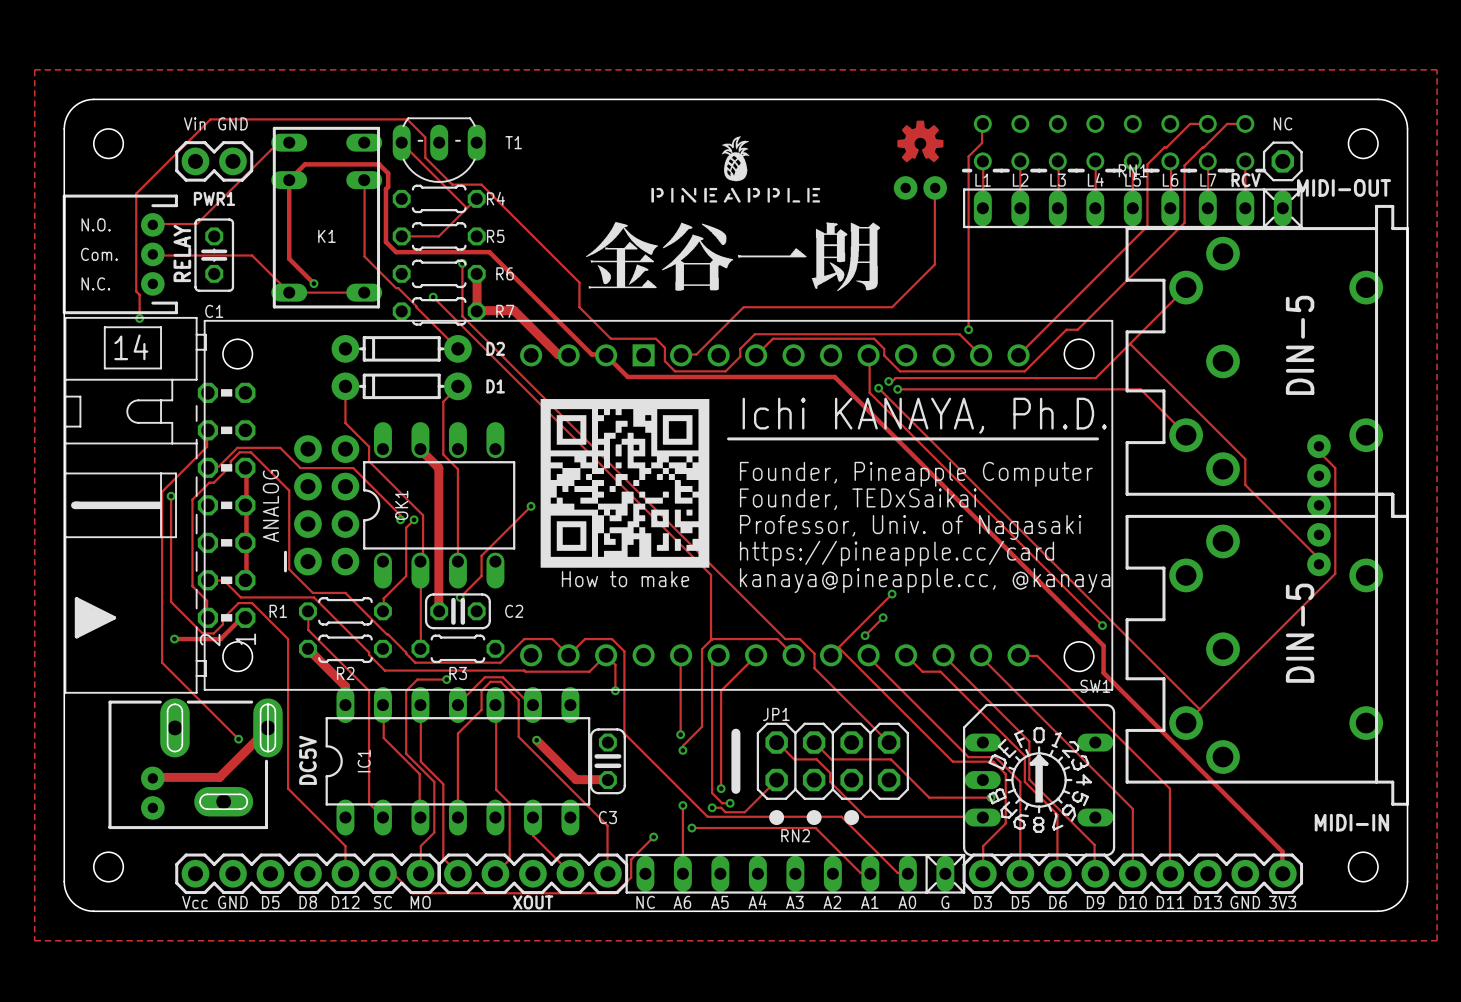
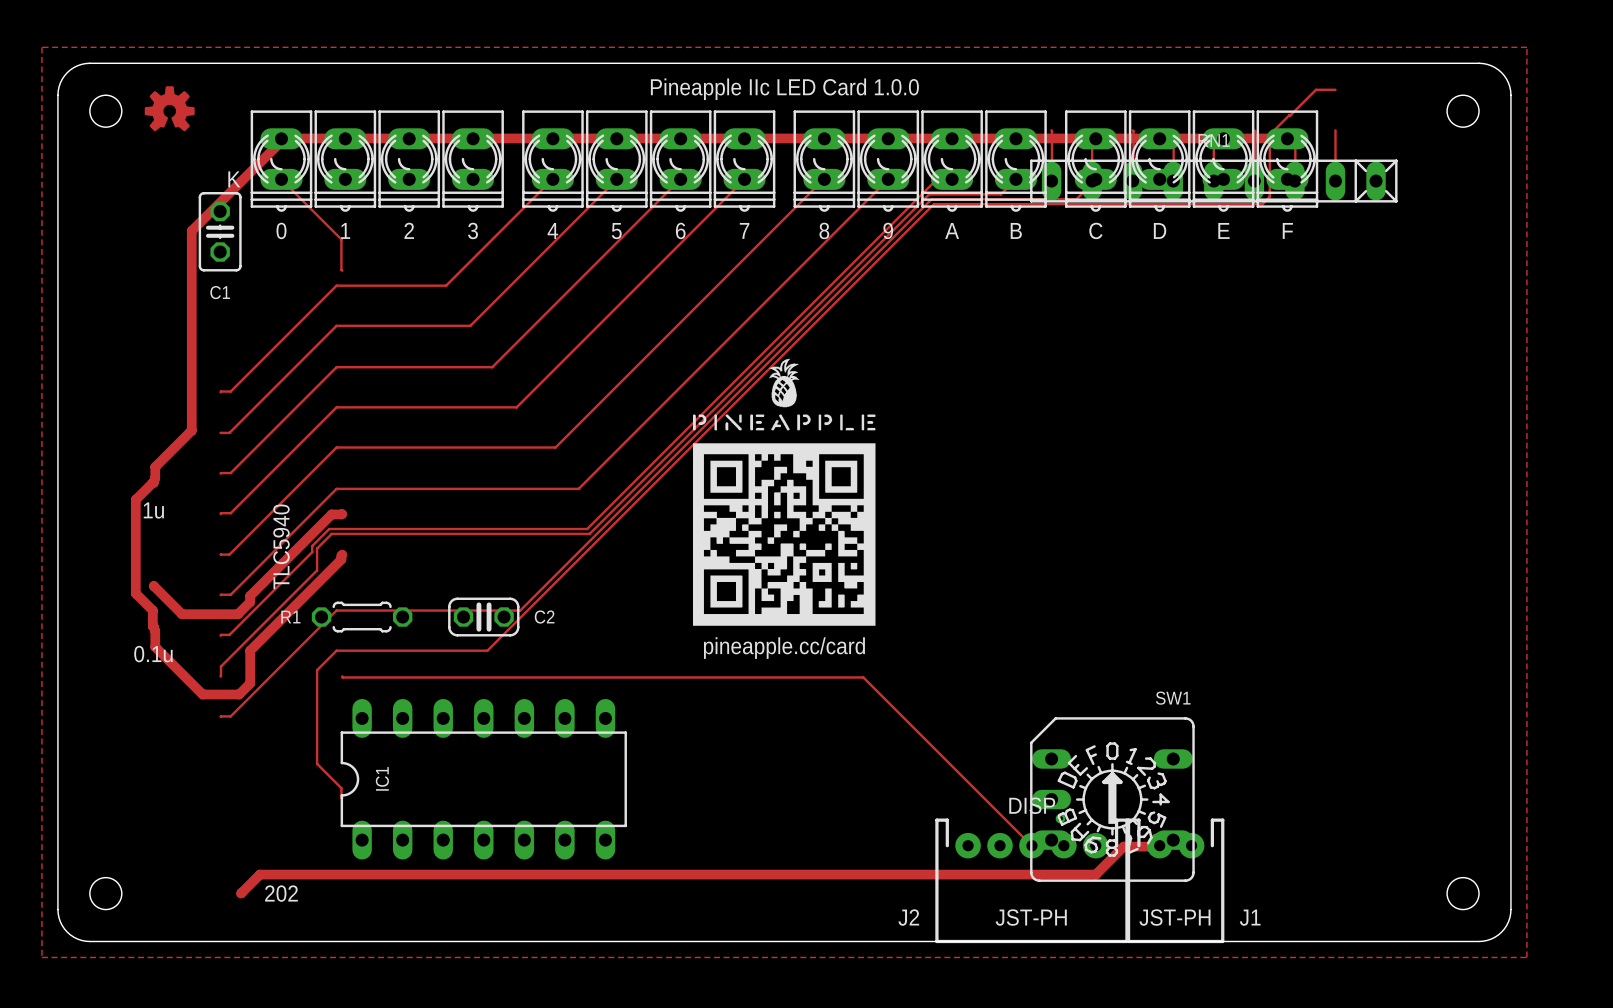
zone outline: (34, 69) (1437, 69) (1437, 940) (34, 940) (34, 69) -> (41, 47) (41, 957) (1526, 957) (1526, 47) (41, 47)
drawing: none -> [144, 86, 195, 132]
drawing: [897, 120, 944, 163] -> none
text: Vin (194, 123) -> none
text: GND (232, 123) -> none
track: (982, 123) (982, 143) (968, 156) (968, 329) -> none
track: (1207, 123) (1190, 123) (1147, 164) (1147, 226) (1018, 355) -> none
text: none -> Pineapple IIc LED Card 1.0.0 (784, 89)
track: (289, 142) (277, 143) (196, 224) (152, 224) -> none
track: (401, 142) (466, 208) -> none
L1: (982, 143) -> none
L2: (1020, 143) -> none
L3: (1057, 143) -> none
L4: (1095, 143) -> none
L5: (1132, 143) -> none
L6: (1170, 143) -> none
L7: (1207, 143) -> none
RCV: (1245, 143) -> none
T1: (439, 150) -> none
PWR1: (214, 161) -> none
NC: (1282, 161) -> none
drawing position: (735, 169) -> (784, 394)
track: none -> (1287, 138) (281, 138) (279, 143) (191, 230) (191, 430) (155, 466) (153, 482) (135, 499) (135, 593) (152, 610) (155, 647) (202, 694) (239, 694) (250, 683) (250, 650) (341, 559) (342, 554)
track: (364, 180) (364, 256) (457, 348) -> none
part: (920, 187) -> none
track: (935, 187) (934, 264) (892, 307) (743, 307) (696, 354) (681, 355) -> none
0: none -> (281, 161)
1: none -> (345, 161)
2: none -> (409, 161)
3: none -> (473, 161)
4: none -> (552, 161)
5: none -> (616, 161)
6: none -> (680, 161)
7: none -> (744, 161)
8: none -> (824, 161)
9: none -> (888, 161)
A: none -> (952, 161)
B: none -> (1015, 161)
C: none -> (1095, 161)
D: none -> (1159, 161)
E: none -> (1223, 161)
F: none -> (1287, 161)
R4: (439, 198) -> none
track: (476, 198) (438, 236) (401, 236) -> none
text: none -> K (234, 179)
track: none -> (281, 179) (341, 239) (342, 270)
track: none -> (552, 179) (446, 285) (336, 285) (230, 391) (220, 392)
track: none -> (616, 179) (470, 325) (336, 325) (229, 432) (220, 432)
track: none -> (680, 179) (492, 367) (336, 367) (230, 473) (220, 473)
track: none -> (744, 179) (516, 407) (336, 407) (230, 513) (220, 514)
track: none -> (824, 179) (555, 447) (336, 447) (229, 554) (220, 554)
track: none -> (888, 179) (578, 488) (336, 488) (230, 594) (220, 595)
track: none -> (952, 179) (936, 179) (587, 529) (329, 529) (312, 546) (312, 552) (229, 634) (220, 635)
track: none -> (1015, 179) (1000, 194) (929, 194) (589, 533) (331, 533) (317, 548) (317, 570) (220, 666) (220, 676)
K1: (326, 217) -> none
drawing: [586, 222, 881, 292] -> none
text: N.O. (96, 224) -> none
track: (1177, 229) (1077, 329) (1066, 329) (1024, 371) (899, 371) (884, 355) (884, 348) (874, 338) (772, 338) (756, 355) -> (1262, 204) (933, 204) (487, 650) (336, 650) (317, 670) (317, 763) (341, 788) (342, 797)
R5: (439, 236) -> none
text: Com. (99, 254) -> none
RELAY: (120, 254) -> none
track: (152, 254) (252, 255) (289, 292) (364, 292) -> none
track: (462, 263) (462, 316) (785, 639) (799, 639) (814, 653) (814, 668) (889, 742) -> none
via: (462, 263) -> none
R6: (439, 273) -> none
track: (476, 273) (476, 311) (514, 310) (558, 354) (568, 355) -> none
text: N.C. (95, 283) -> none
track: (313, 283) (289, 258) (289, 180) (304, 164) (379, 164) (388, 173) (388, 186) (385, 189) (385, 242) (396, 252) (489, 252) (591, 354) (605, 354) (627, 376) (834, 376) (1103, 645) (1103, 672) (1282, 851) (1282, 873) -> none
via: (313, 283) -> none
track: (1186, 287) (1095, 378) (895, 378) (892, 381) (888, 381) -> none
track: (433, 297) (711, 574) (711, 639) -> none
via: (433, 297) -> none
R7: (439, 311) -> none
track: (139, 318) (139, 294) (136, 291) (136, 193) (210, 119) (407, 119) (425, 137) (425, 157) (452, 184) (481, 184) (579, 282) (579, 307) (610, 338) (655, 338) (664, 347) (664, 361) (675, 371) (725, 371) -> (220, 716) (230, 716) (336, 610) (520, 610) (773, 357)
via: (139, 318) -> none
via: (968, 329) -> none
track: (1130, 343) (1245, 459) (1245, 484) (1318, 558) (1318, 564) -> none
D2: (401, 348) -> none
track: (868, 355) (869, 392) (1102, 625) -> none
track: (980, 355) (959, 334) (754, 334) (740, 348) (740, 356) -> (1095, 179) (1076, 199) (931, 199) (789, 341)
MIDI-OUT: (1267, 361) -> none
via: (888, 381) -> none
track: (345, 386) (345, 423) (369, 446) (369, 461) (423, 515) (423, 559) (420, 561) (420, 648) -> none
D1: (401, 386) -> none
track: (457, 386) (443, 401) (443, 454) (457, 469) (457, 561) -> none
track: (878, 388) (1199, 709) -> none
via: (878, 388) -> none
track: (897, 389) (1140, 389) (1186, 435) -> none
via: (897, 389) -> none
text: Ichi KANAYA, Ph.D. (924, 415) -> none
track: (207, 430) (207, 446) (162, 491) (162, 662) (238, 739) -> none
line: (728, 438) (1097, 438) -> none
track: (1318, 446) (1319, 452) (1335, 468) (1335, 573) (1186, 723) -> none
track: (420, 449) (438, 468) (439, 611) -> none
track: (207, 467) (218, 466) (237, 447) (280, 447) (300, 468) (353, 468) (400, 515) (400, 519) -> none
track: (245, 467) (245, 580) -> none
text: Founder, Pineapple Computer (916, 474) -> none
drawing position: (625, 483) -> (784, 534)
track: (171, 496) (171, 601) (202, 633) (213, 633) (222, 624) (222, 618) (238, 603) (252, 603) (288, 639) (288, 788) (345, 846) (345, 873) -> none
via: (171, 496) -> none
text: Founder, TEDxSaikai (858, 499) -> none
ANALOG: (159, 505) -> none
part: (321, 505) -> none
OK1: (439, 505) -> none
part: (658, 505) -> none
part: (1318, 505) -> none
track: (531, 506) (481, 555) (481, 576) (460, 597) -> none
via: (531, 506) -> none
text: none -> 1u (153, 510)
track: none -> (342, 514) (331, 514) (250, 595) (250, 602) (238, 614) (182, 614) (153, 585)
via: (400, 519) -> none
track: (414, 519) (406, 527) (406, 576) (383, 598) (382, 611) -> none
via: (414, 519) -> none
text: Professor, Univ. of Nagasaki (910, 527) -> none
text: none -> TLC5940 (281, 546)
text: https://pineapple.cc/card (897, 553) -> none
text: How to make (625, 579) -> none
track: (207, 580) (223, 580) (240, 597) (313, 597) (384, 670) (589, 671) (606, 655) (615, 664) (615, 690) -> none
text: kanaya@pineapple.cc, @kanaya (925, 580) -> none
track: (892, 594) (831, 655) (839, 648) (952, 761) (993, 761) (1005, 774) (1005, 823) (983, 846) (982, 873) -> none
via: (892, 594) -> none
via: (460, 597) -> none
track: (307, 611) (308, 630) (369, 690) (369, 803) (382, 817) -> none
track: (207, 617) (207, 600) (192, 586) (192, 499) (209, 482) (213, 482) (230, 465) (230, 461) (239, 452) (250, 452) (289, 490) (289, 569) (312, 592) (345, 592) (415, 662) (500, 662) (524, 639) (552, 639) (568, 655) (585, 639) (612, 639) (624, 651) (624, 733) (707, 816) (841, 816) (897, 873) (907, 873) -> none
track: (245, 617) (240, 618) (220, 639) (174, 639) -> none
track: (883, 617) (865, 635) -> none
via: (883, 617) -> none
via: (1102, 625) -> none
via: (865, 635) -> none
via: (174, 639) -> none
text: none -> pineapple.cc/card (784, 648)
text: none -> 0.1u (153, 654)
track: (307, 648) (345, 686) (345, 705) -> none
R2: (345, 648) -> none
R3: (457, 648) -> none
MIDI-IN: (1267, 649) -> none
track: (681, 655) (680, 734) -> none
track: (718, 655) (712, 661) (712, 793) (722, 803) (730, 803) -> none
track: (756, 655) (721, 690) (721, 788) -> none
track: (793, 655) (777, 639) (712, 639) (702, 649) (702, 726) (682, 745) (682, 750) -> none
track: (868, 655) (968, 757) (995, 757) (1020, 781) (1020, 873) -> none
track: (906, 655) (922, 671) (940, 671) (1024, 756) (1024, 781) (1057, 814) (1057, 873) -> none
track: (943, 655) (1029, 741) (1029, 779) (1094, 844) (1095, 873) -> none
track: (981, 655) (1132, 808) (1132, 873) -> none
track: (1018, 655) (1037, 655) (1169, 788) (1170, 873) -> none
track: none -> (342, 676) (863, 677) (1031, 845)
track: (446, 679) (417, 679) (406, 690) (406, 753) (434, 781) (434, 832) (420, 846) (420, 873) -> none
via: (446, 679) -> none
via: (615, 690) -> none
track: (382, 705) (383, 738) (419, 774) (420, 817) -> none
track: (420, 705) (420, 761) (443, 784) (443, 858) (457, 873) -> none
track: (457, 705) (484, 677) (502, 677) (532, 705) -> none
track: (495, 705) (496, 789) (509, 803) (509, 859) (495, 873) -> none
track: (267, 727) (219, 777) (152, 778) -> none
line: (735, 733) (735, 789) -> none
via: (680, 734) -> none
via: (238, 739) -> none
track: (536, 740) (576, 779) (607, 780) -> none
via: (536, 740) -> none
track: (776, 742) (794, 759) (816, 759) (830, 772) (830, 781) (865, 816) (982, 817) -> none
track: (814, 742) (831, 759) (890, 759) (929, 797) (991, 797) -> none
via: (682, 750) -> none
C3: (607, 761) -> none
JP1: (832, 761) -> none
DC5V: (195, 763) -> none
track: (776, 780) (744, 812) (725, 812) (721, 807) (712, 807) -> none
text: none -> DISP (1032, 805)
via: (721, 788) -> none
part: (152, 793) -> none
via: (730, 803) -> none
track: (682, 805) (682, 873) -> none
via: (682, 805) -> none
via: (712, 807) -> none
drawing: [769, 810, 785, 826] -> none
drawing: [806, 810, 822, 826] -> none
drawing: [844, 810, 860, 826] -> none
track: (457, 817) (457, 733) (481, 709) (481, 690) (490, 681) (500, 681) (518, 699) (518, 736) (607, 825) (607, 873) -> none
track: (532, 817) (533, 835) (570, 873) -> none
track: none -> (1159, 845) (1123, 846) (1095, 874) (259, 874) (240, 893)
track: (691, 828) (815, 828) (860, 873) (870, 873) -> none
via: (691, 828) -> none
track: (653, 837) (631, 859) (631, 877) (615, 893) (412, 893) (393, 874) (382, 873) -> none
via: (653, 837) -> none
J2: none -> (1031, 880)
J1: none -> (1175, 880)
text: none -> 202 (281, 893)
part: (307, 873) -> none
XOUT: (532, 873) -> none
RN2: (795, 873) -> none
part: (1132, 873) -> none
text: none -> JST-PH (1031, 917)
text: Vcc (194, 902) -> none
text: GND (232, 902) -> none
text: D5 (270, 902) -> none
text: D8 (308, 902) -> none
text: D12 (345, 902) -> none
text: SC (382, 902) -> none
text: MO (420, 902) -> none
text: NC (645, 902) -> none
text: A6 (682, 902) -> none
text: A5 (719, 902) -> none
text: A4 (757, 902) -> none
text: A3 (794, 902) -> none
text: A2 (832, 902) -> none
text: A1 (869, 902) -> none
text: A0 (907, 902) -> none
text: G (945, 902) -> none
text: D3 (983, 902) -> none
text: D5 (1020, 902) -> none
text: D6 (1058, 902) -> none
text: D9 (1095, 902) -> JST-PH (1174, 917)
text: D10 (1133, 902) -> none
text: D11 (1170, 902) -> none
text: D13 (1208, 902) -> none
text: GND (1245, 902) -> none
text: 3V3 (1282, 902) -> none

